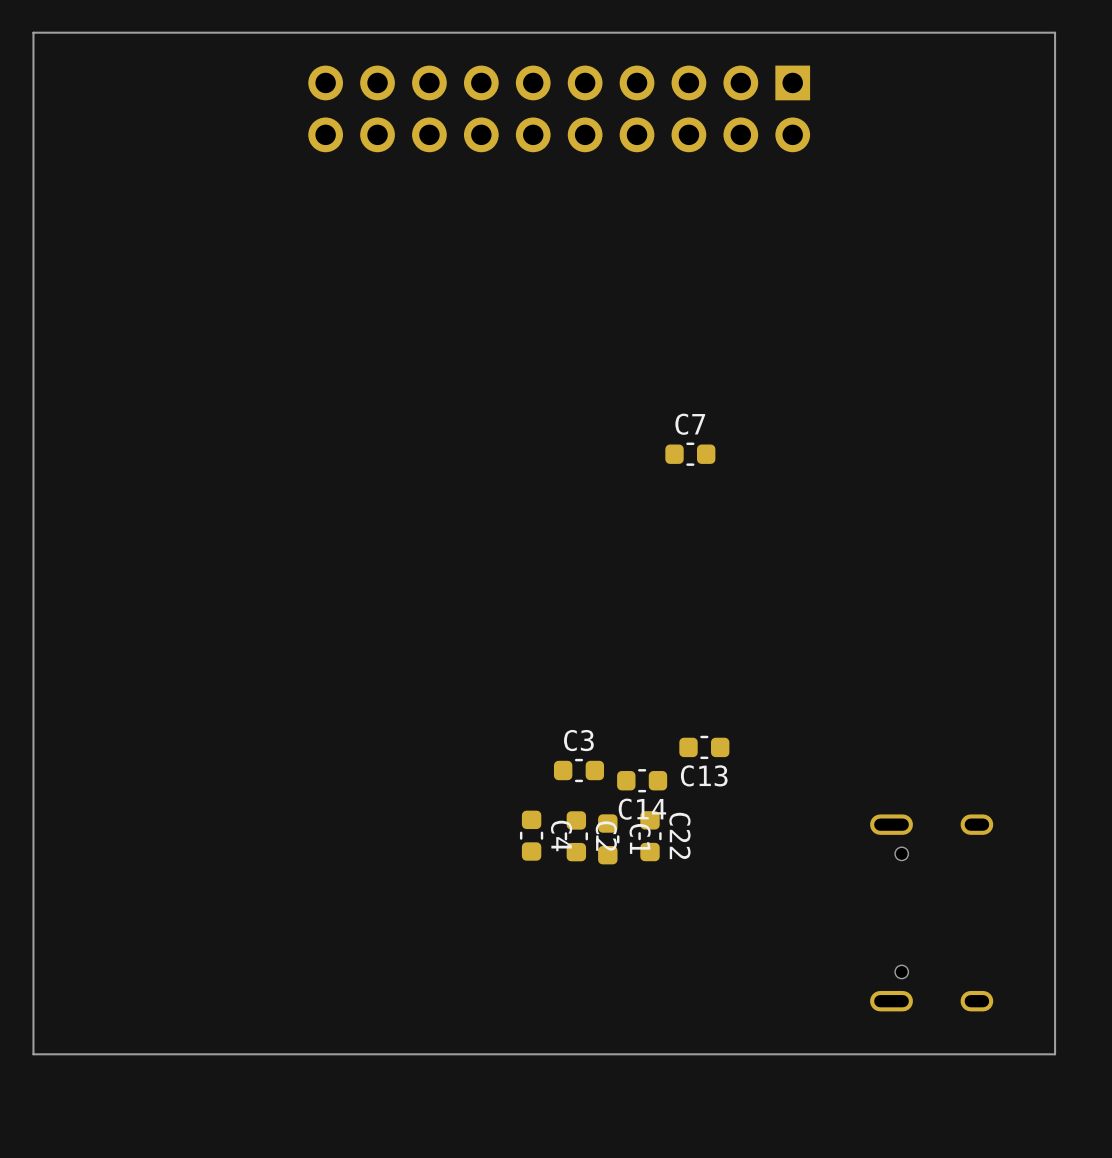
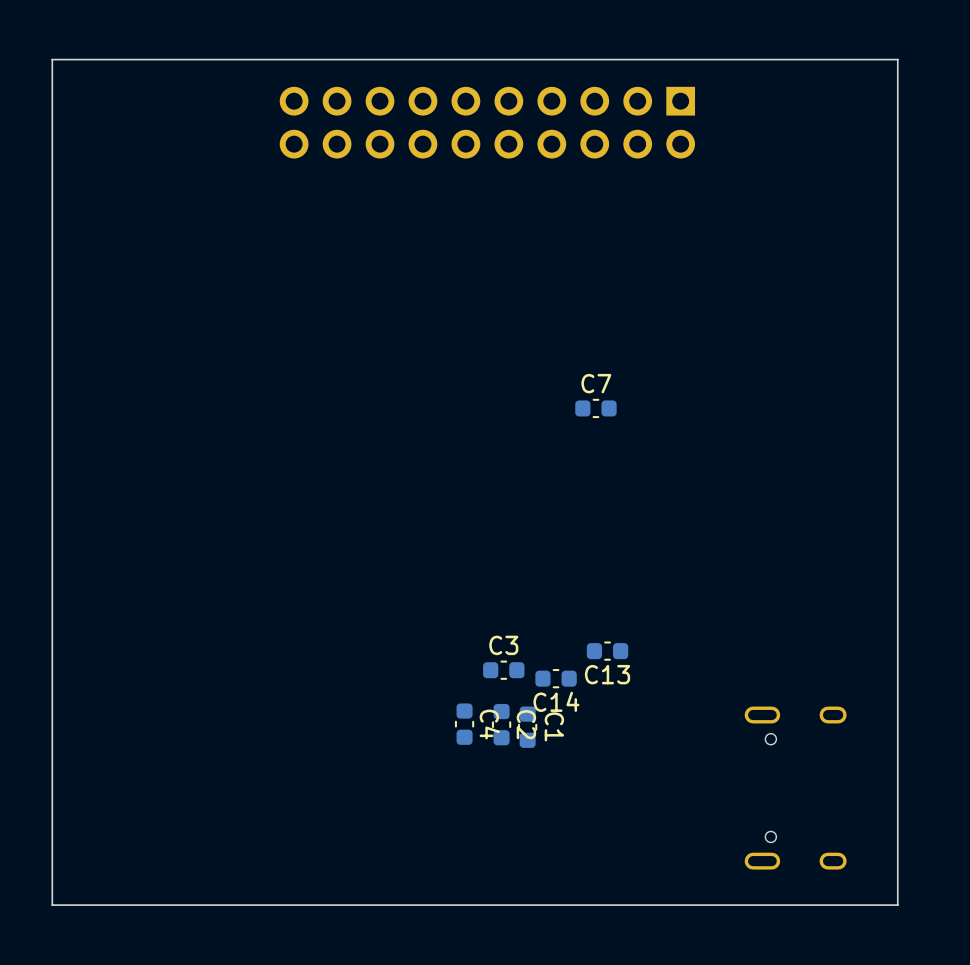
C22: (650, 836) -> none

